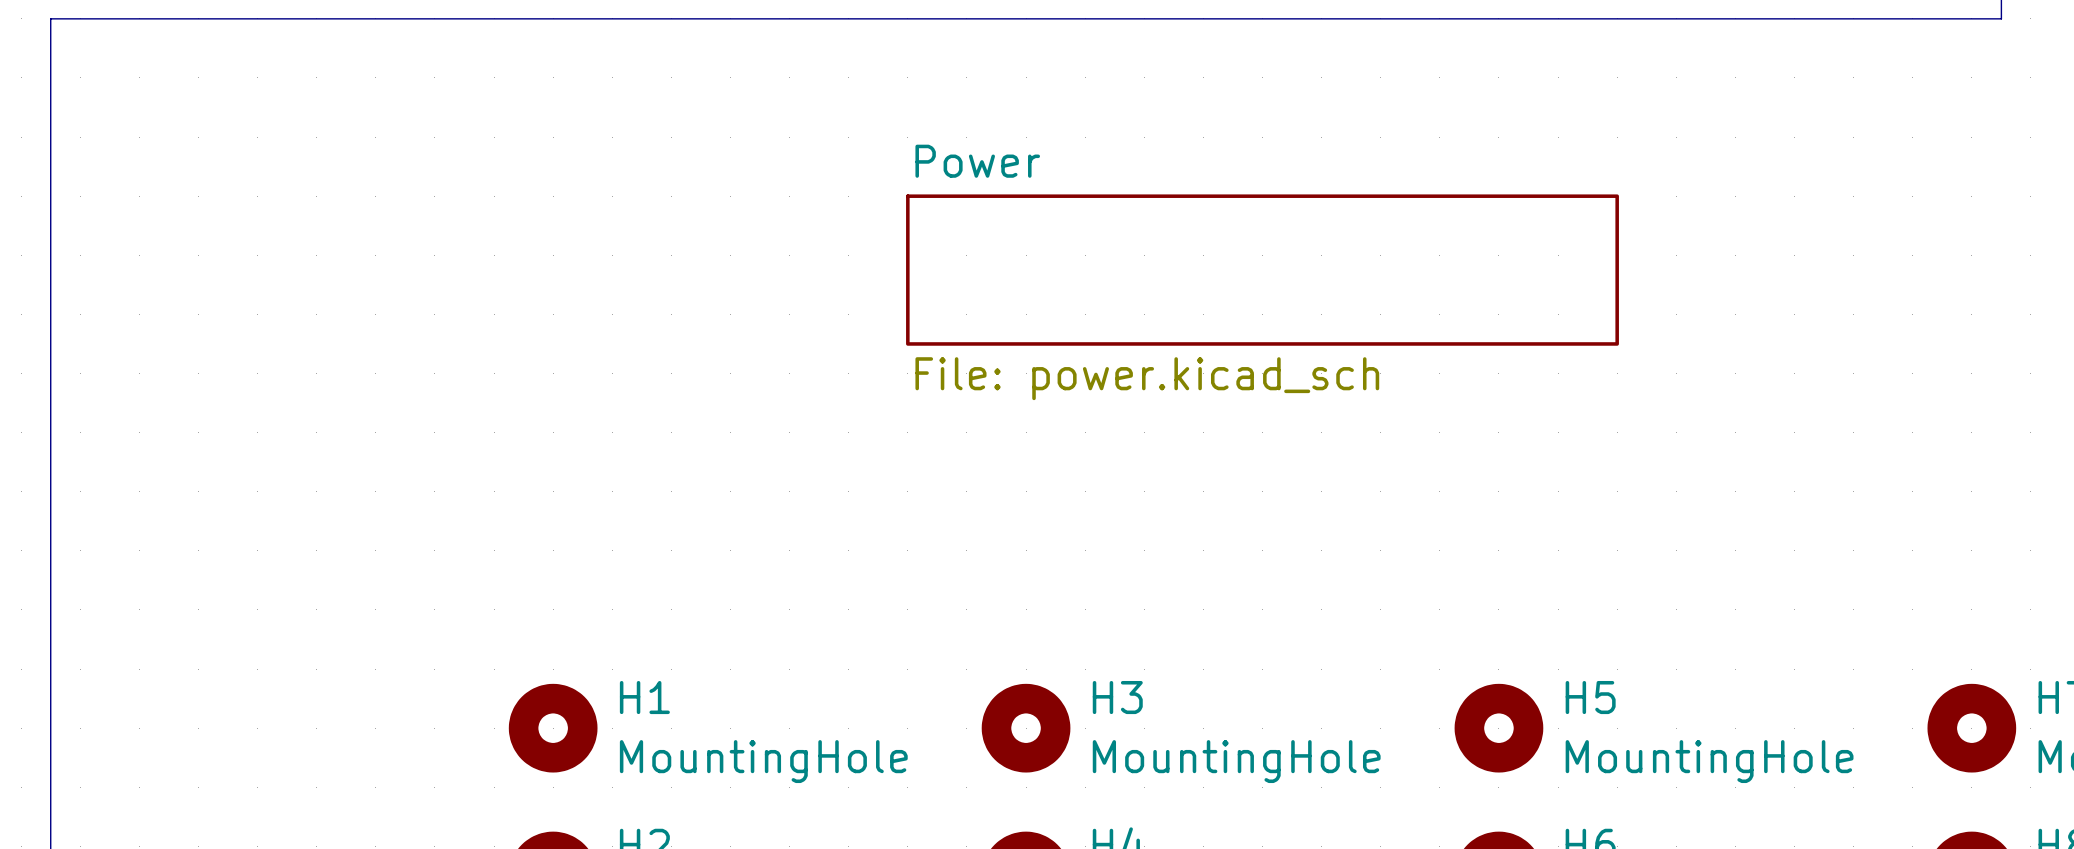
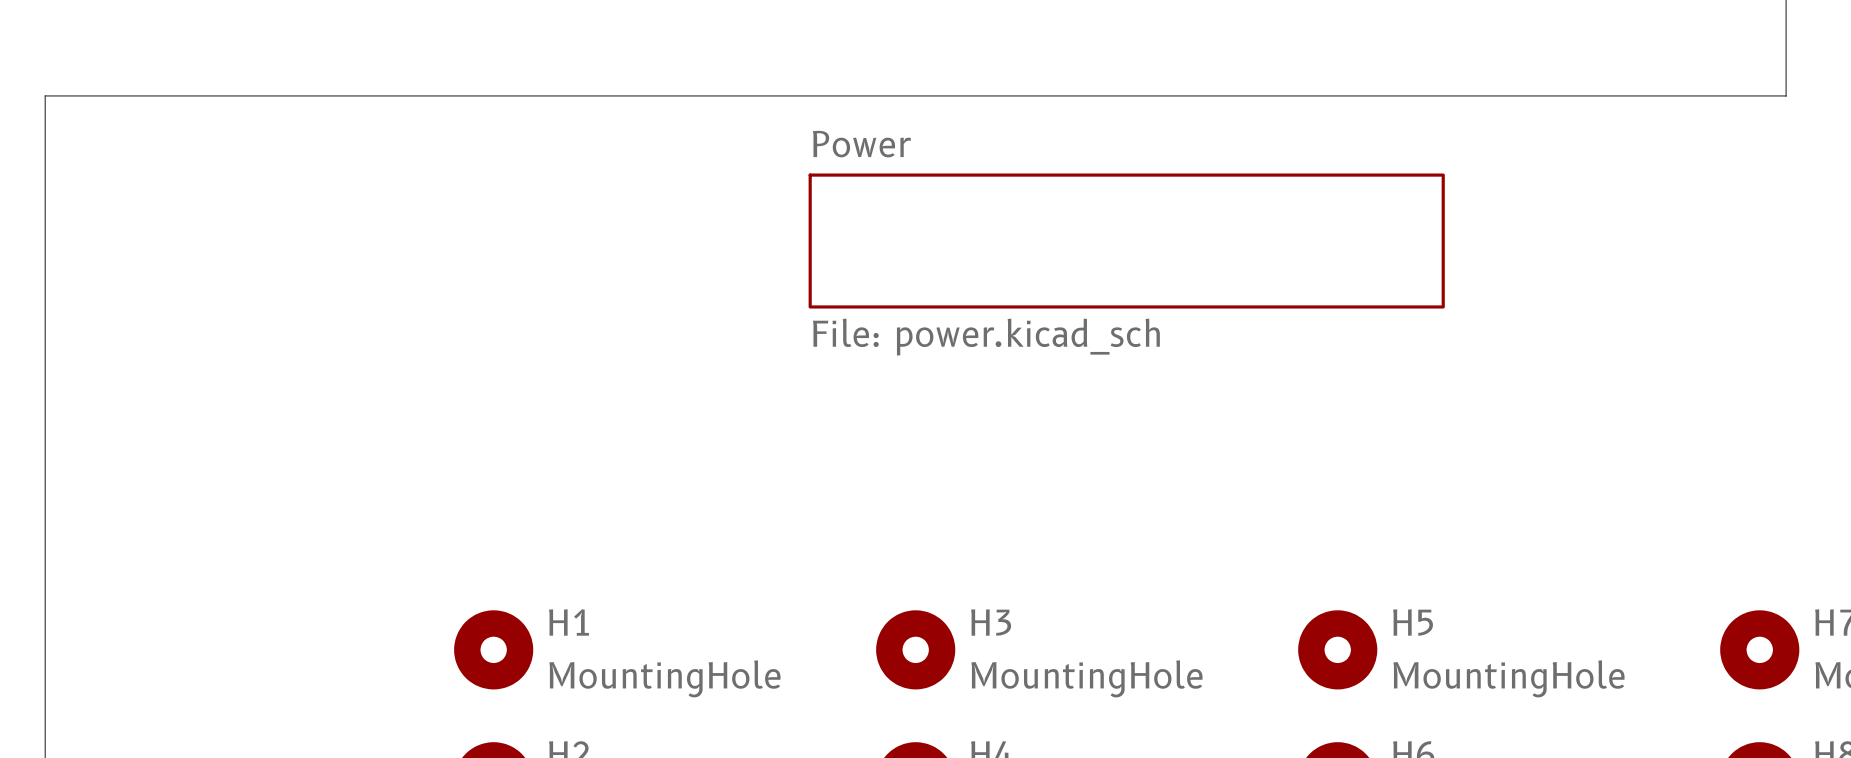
bus: (2001, 18) (50, 18) (50, 107) -> (1786, 16) (1786, 95) (45, 95)

